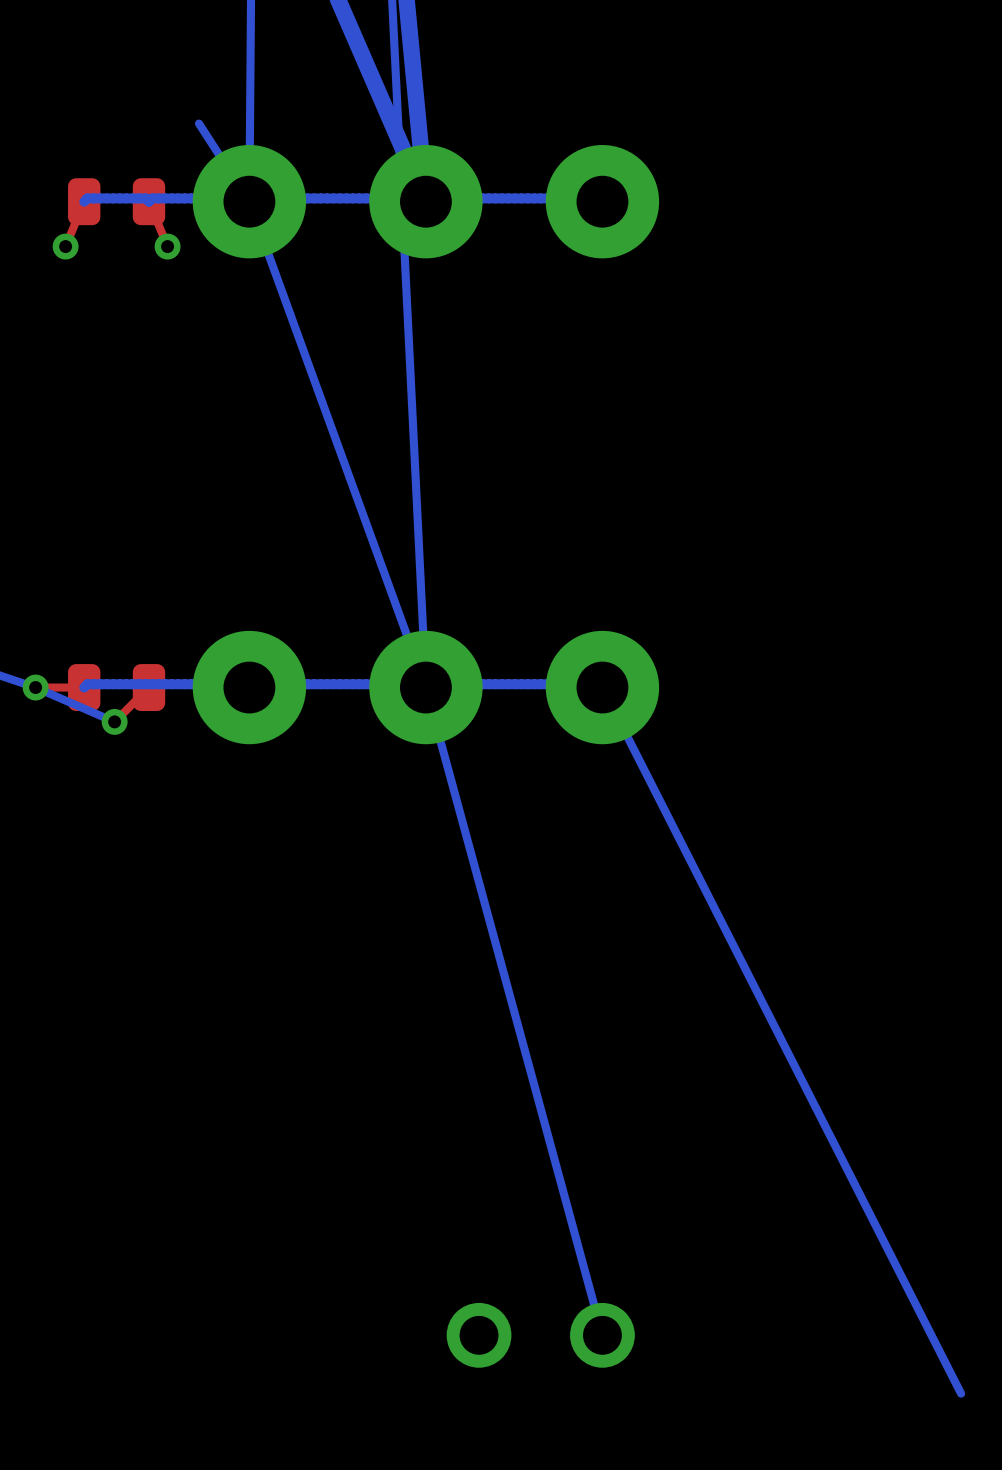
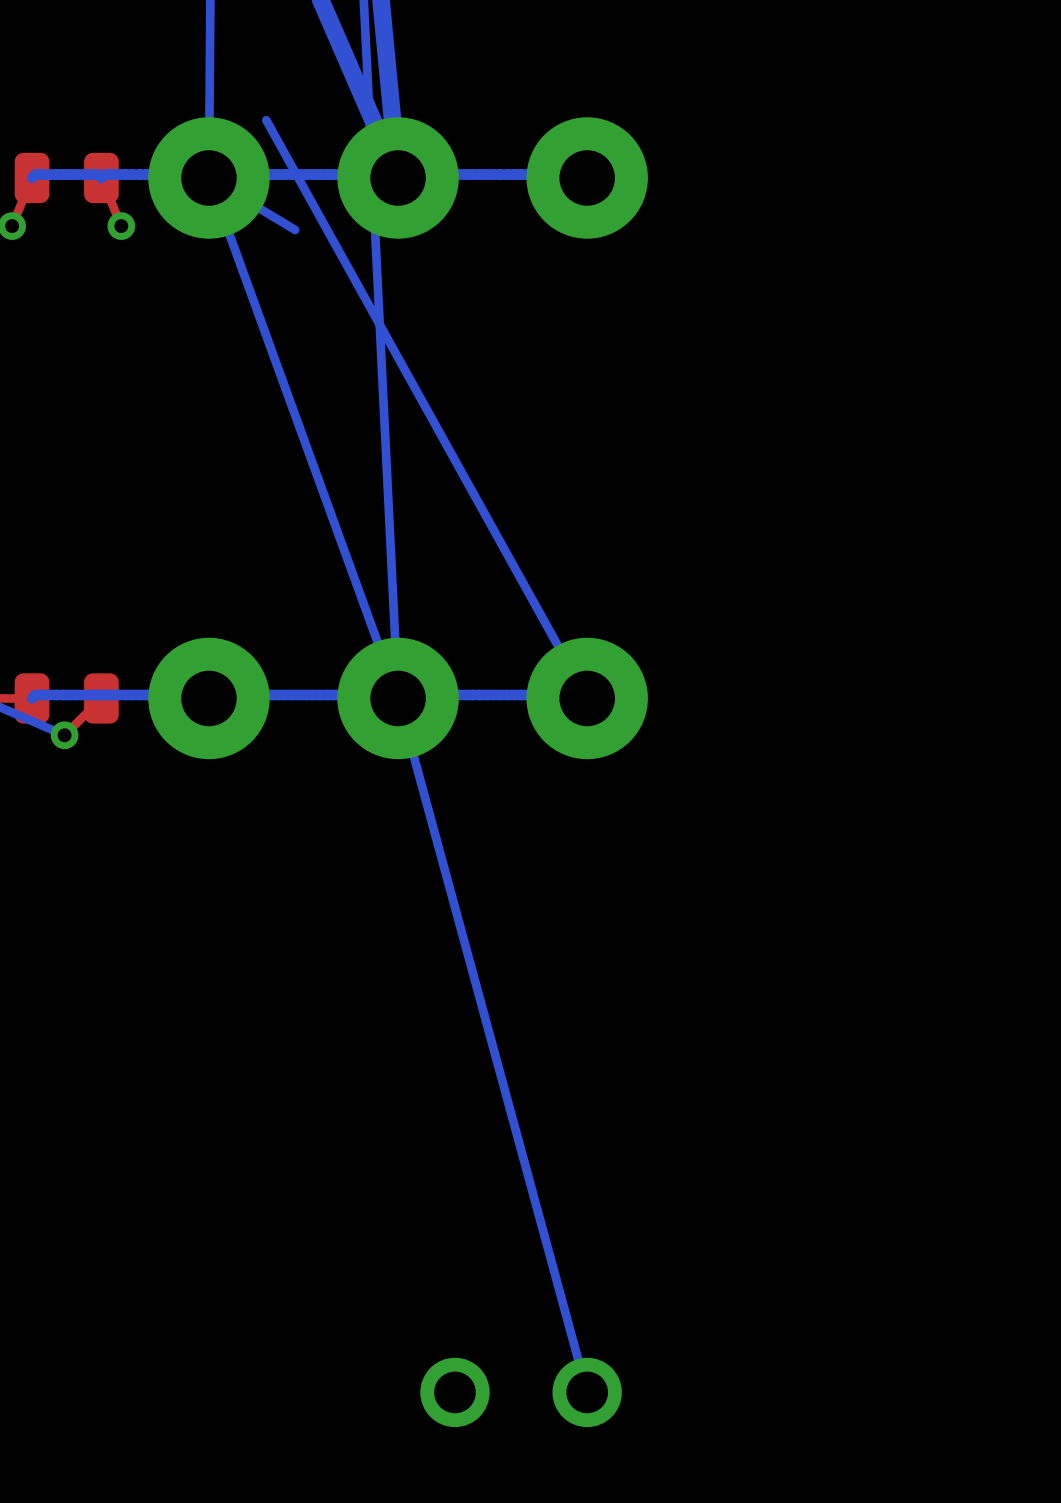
bottom track: (198, 123) (249, 201) -> (295, 229) (208, 177)
bottom track: (602, 687) (961, 1393) -> (587, 698) (266, 120)

